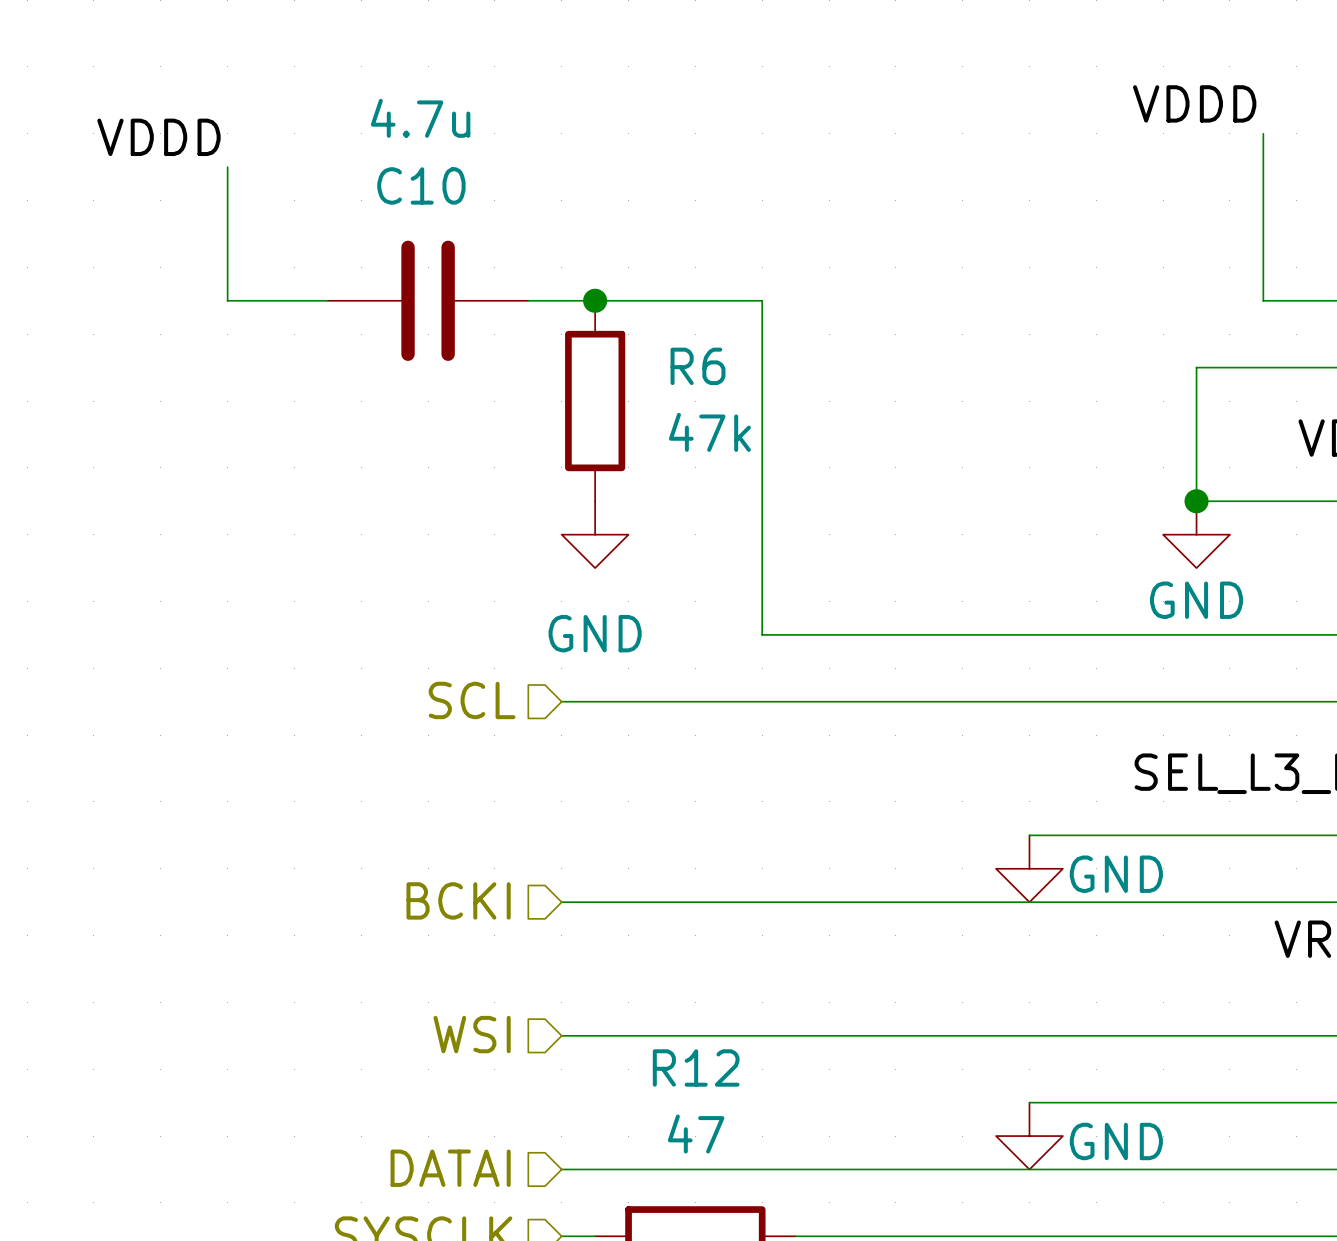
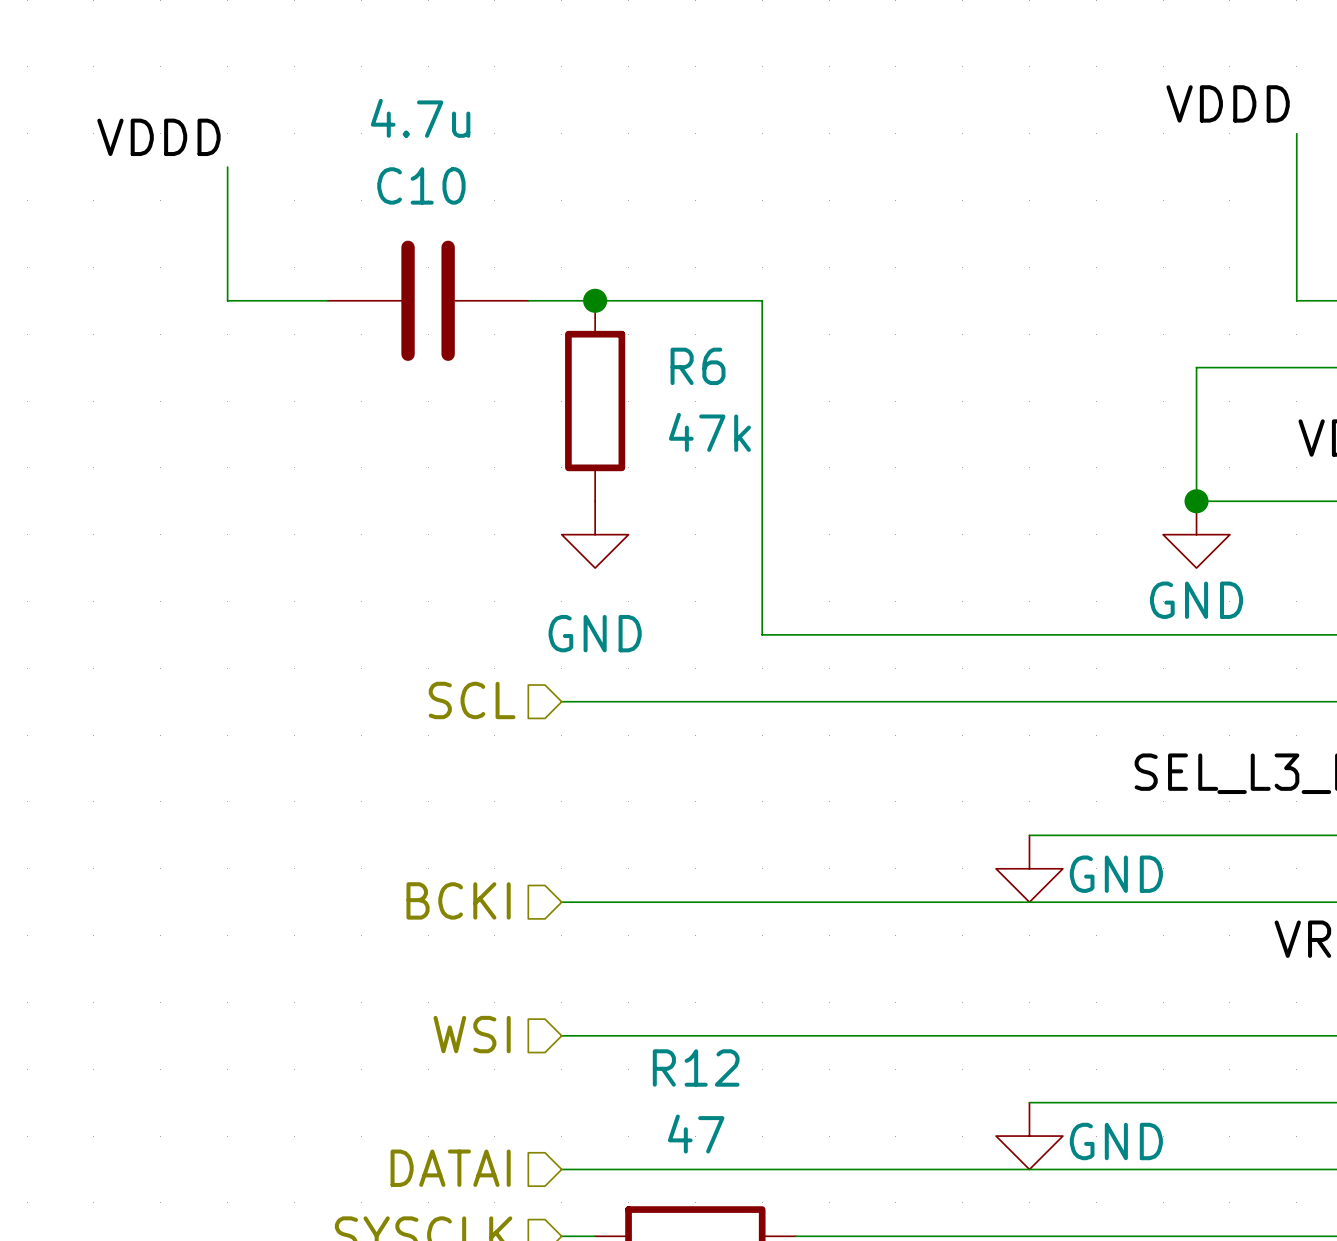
label position: VDDD (1194, 103) -> VDDD (1228, 103)
wire: (1263, 133) (1263, 300) (1296, 300) -> (1296, 133) (1296, 300)

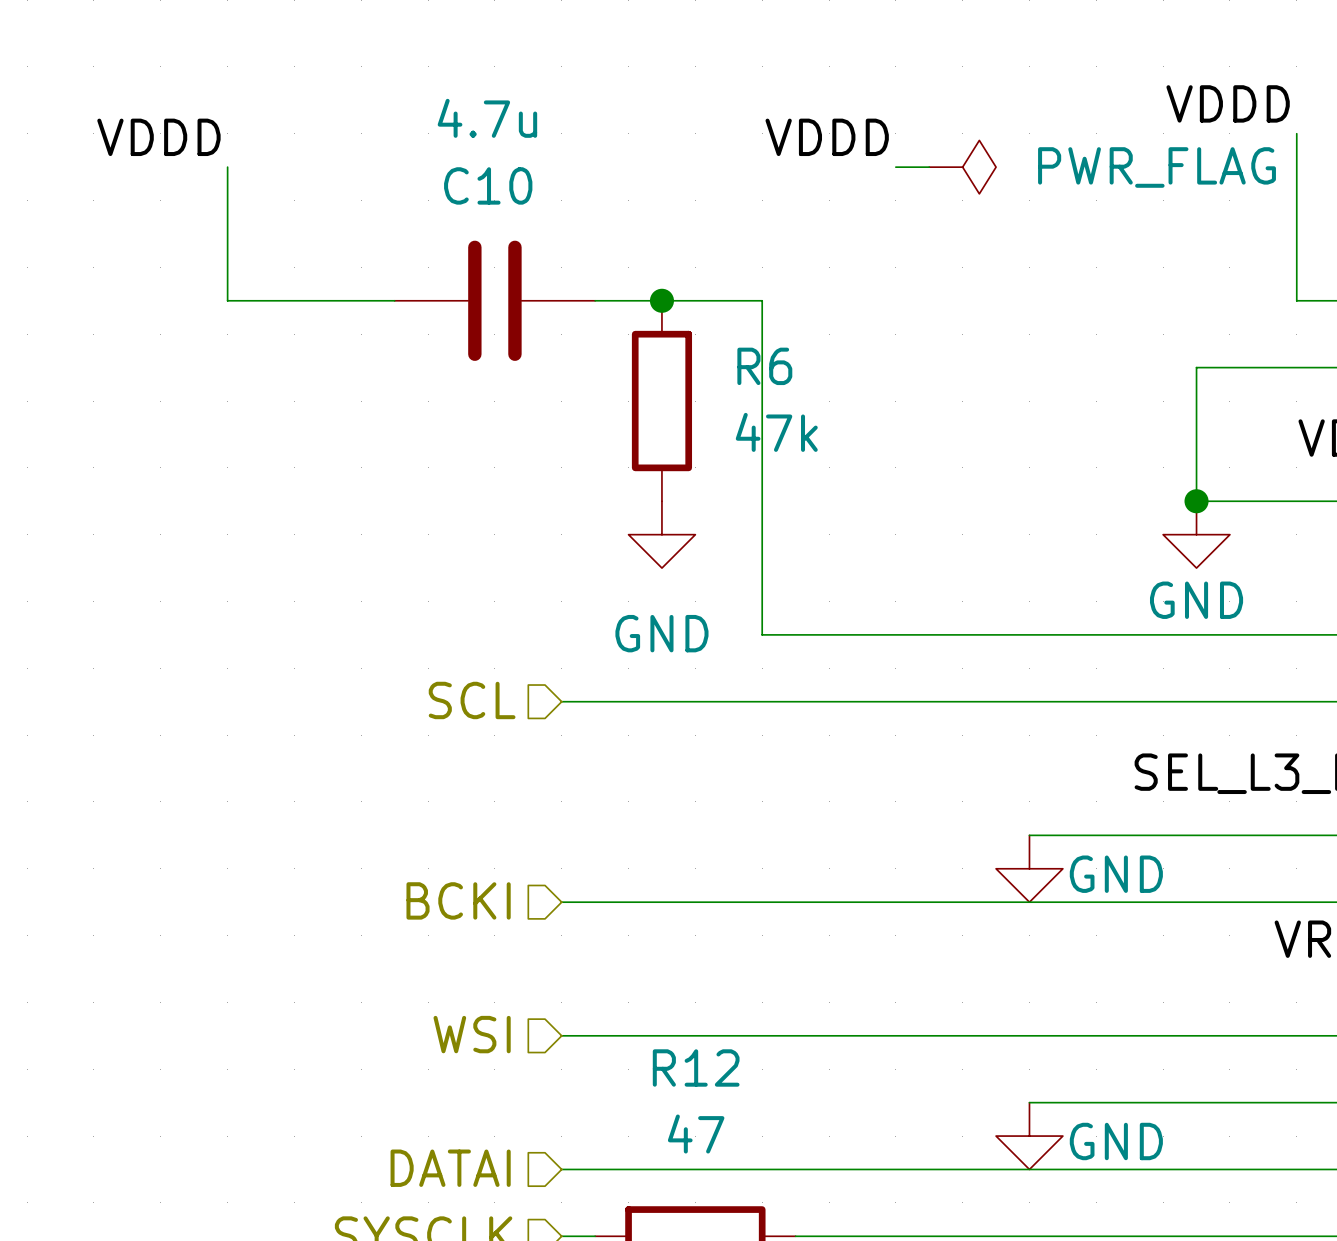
label: none -> VDDD (827, 137)
wire: none -> (895, 167) (929, 167)
power symbol: none -> PWR_FLAG (962, 167)
C10 position: (428, 300) -> (494, 300)
junction position: (595, 300) -> (661, 300)
R6 position: (595, 401) -> (661, 401)
power symbol position: GND (595, 534) -> GND (661, 534)

